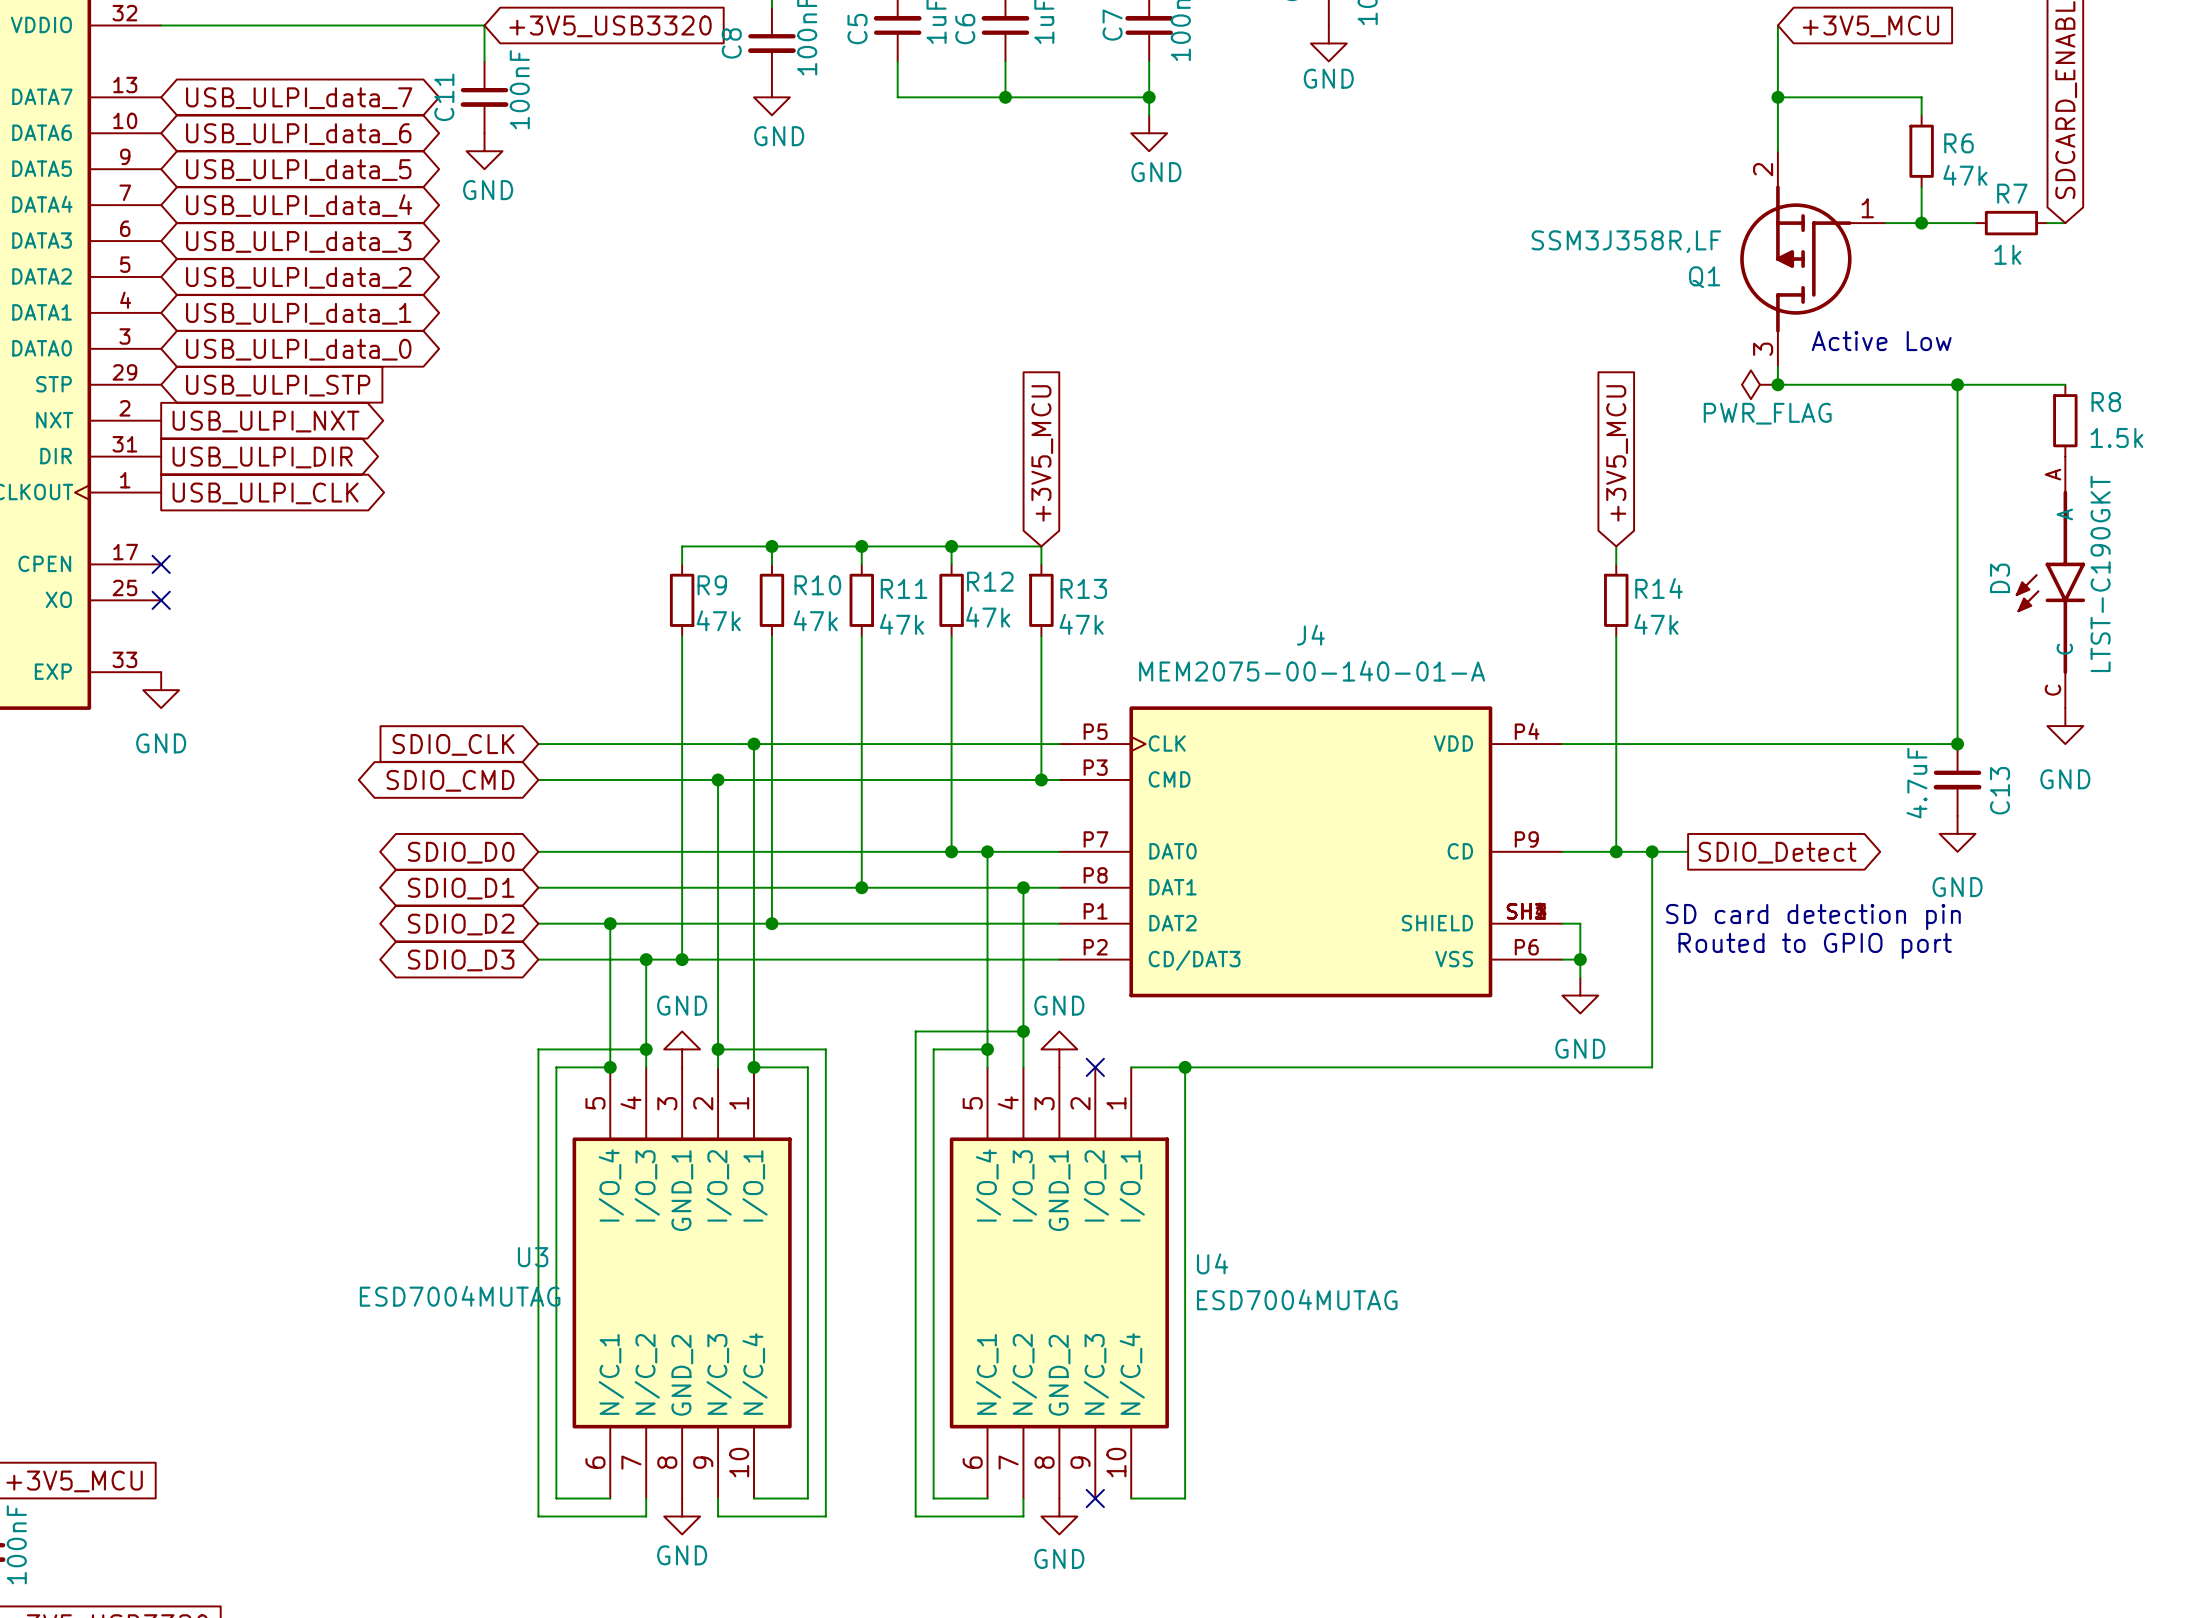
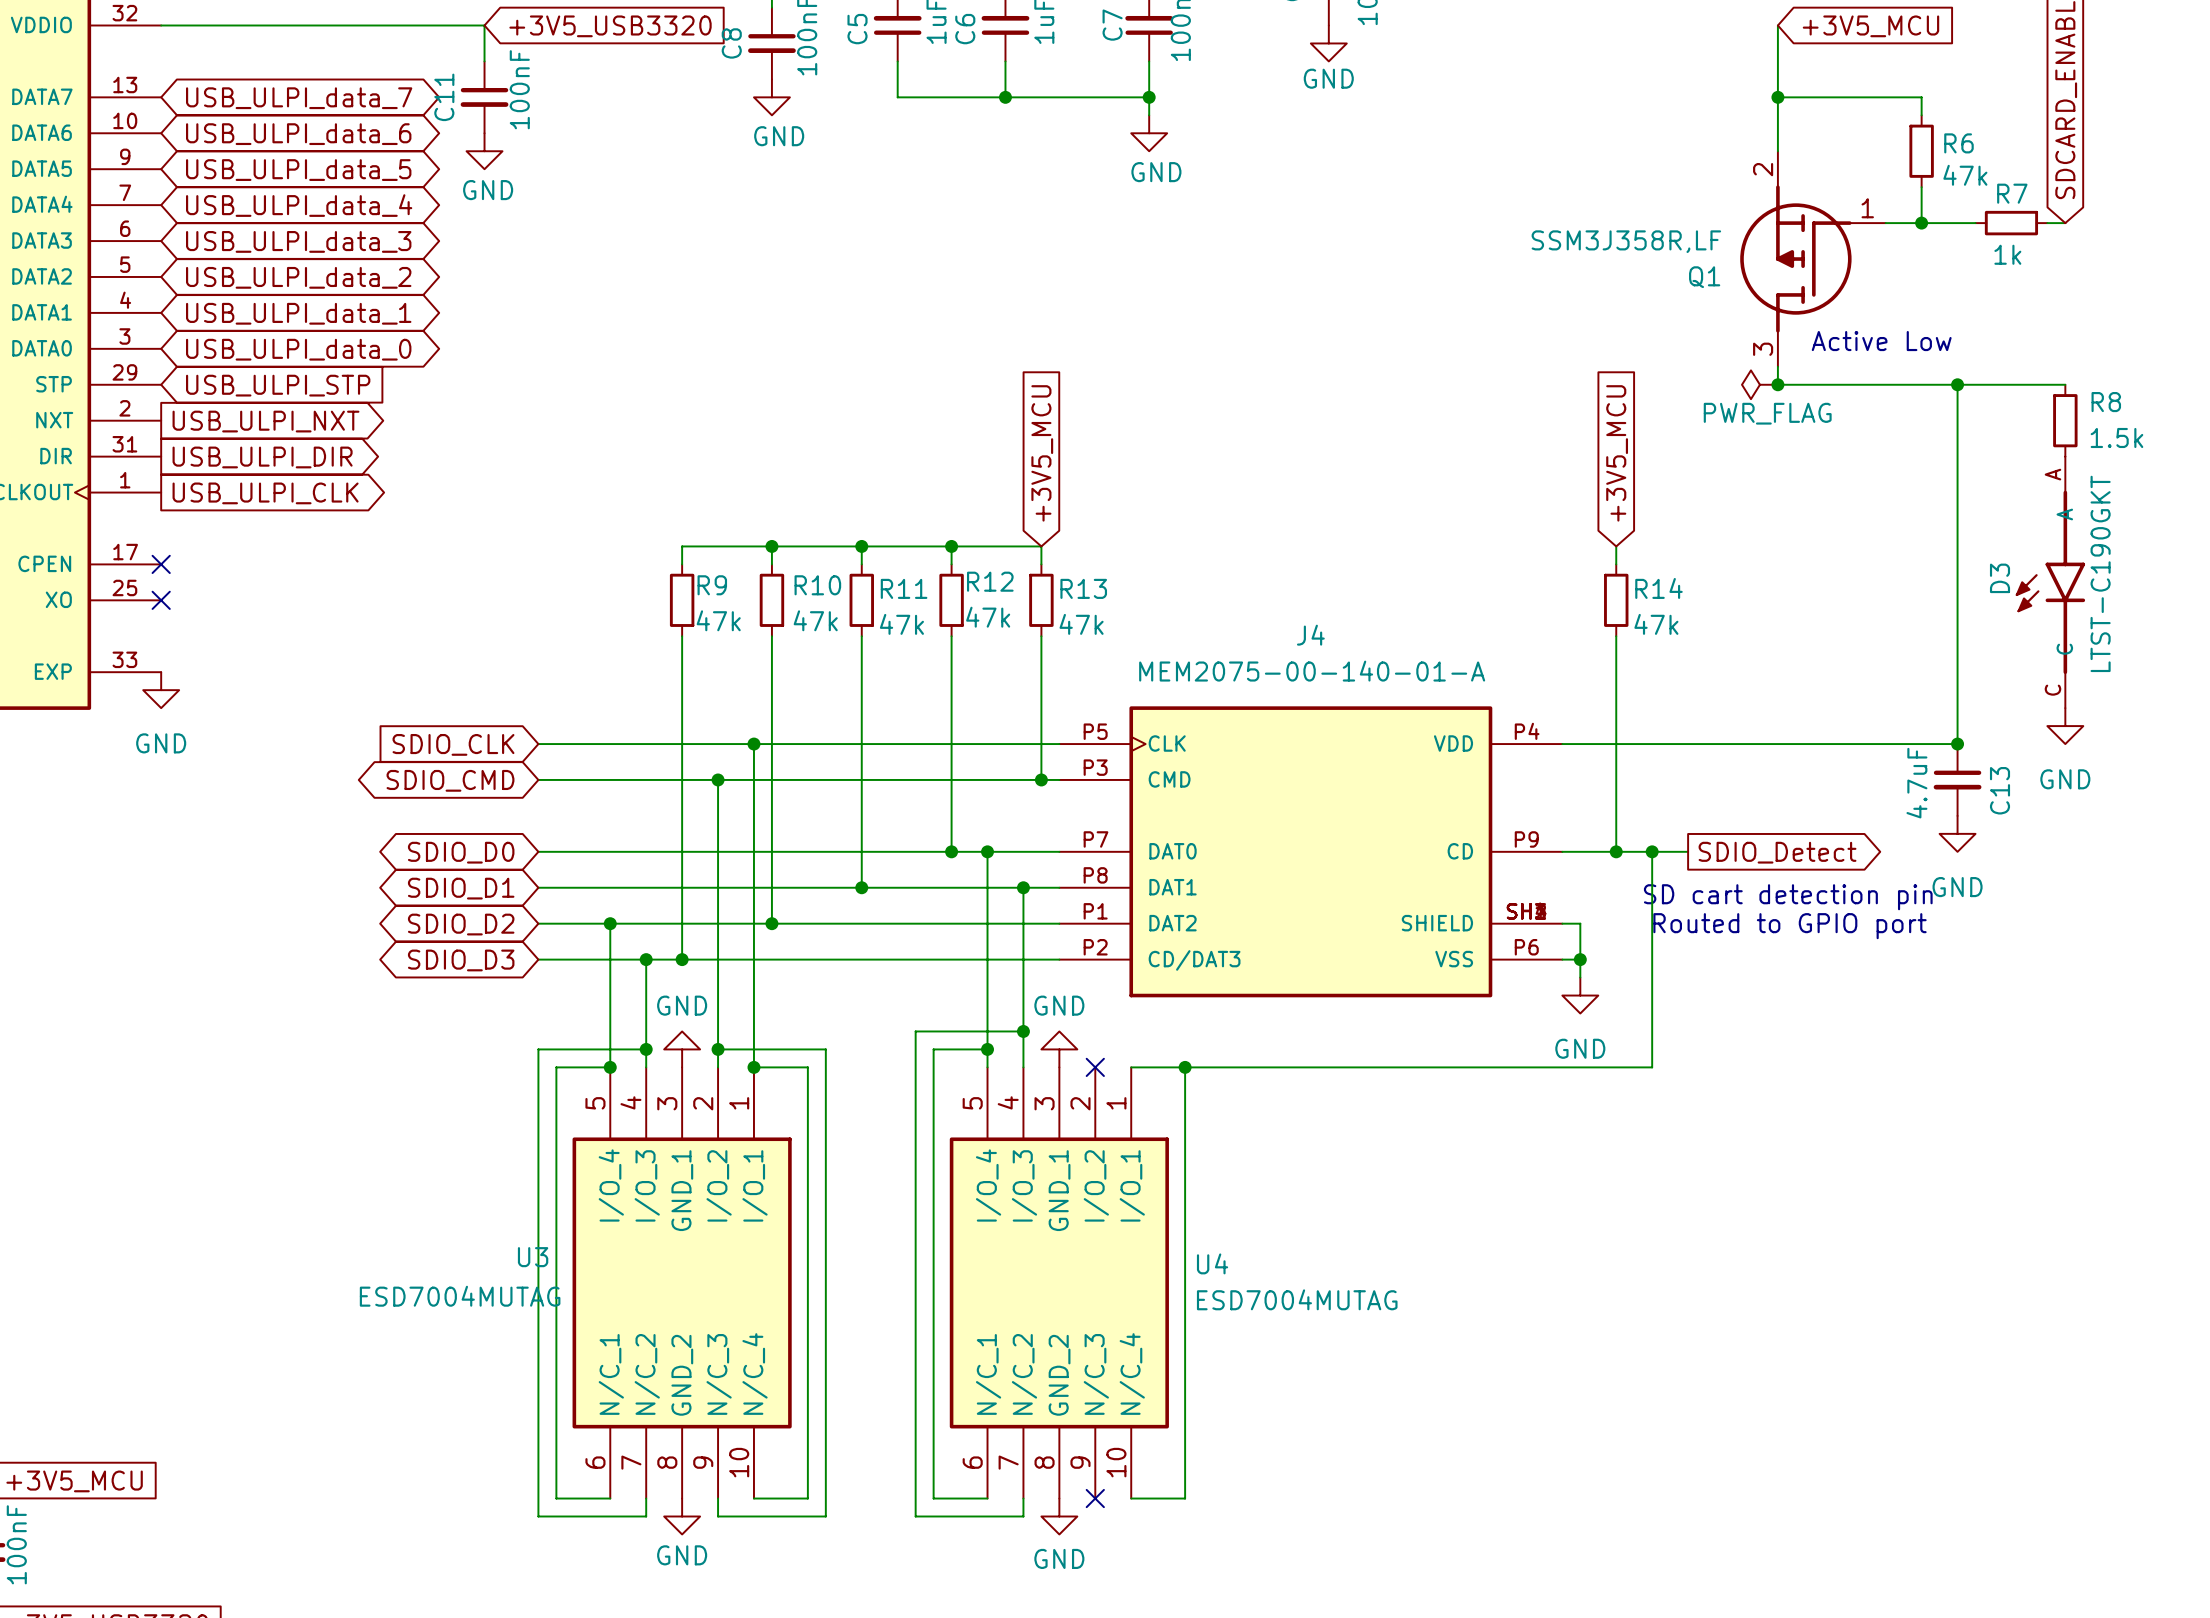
text: SD card detection pin (1813, 916) -> SD cart detection pin (1788, 897)
text position: Routed to GPIO port (1815, 945) -> Routed to GPIO port (1789, 926)

